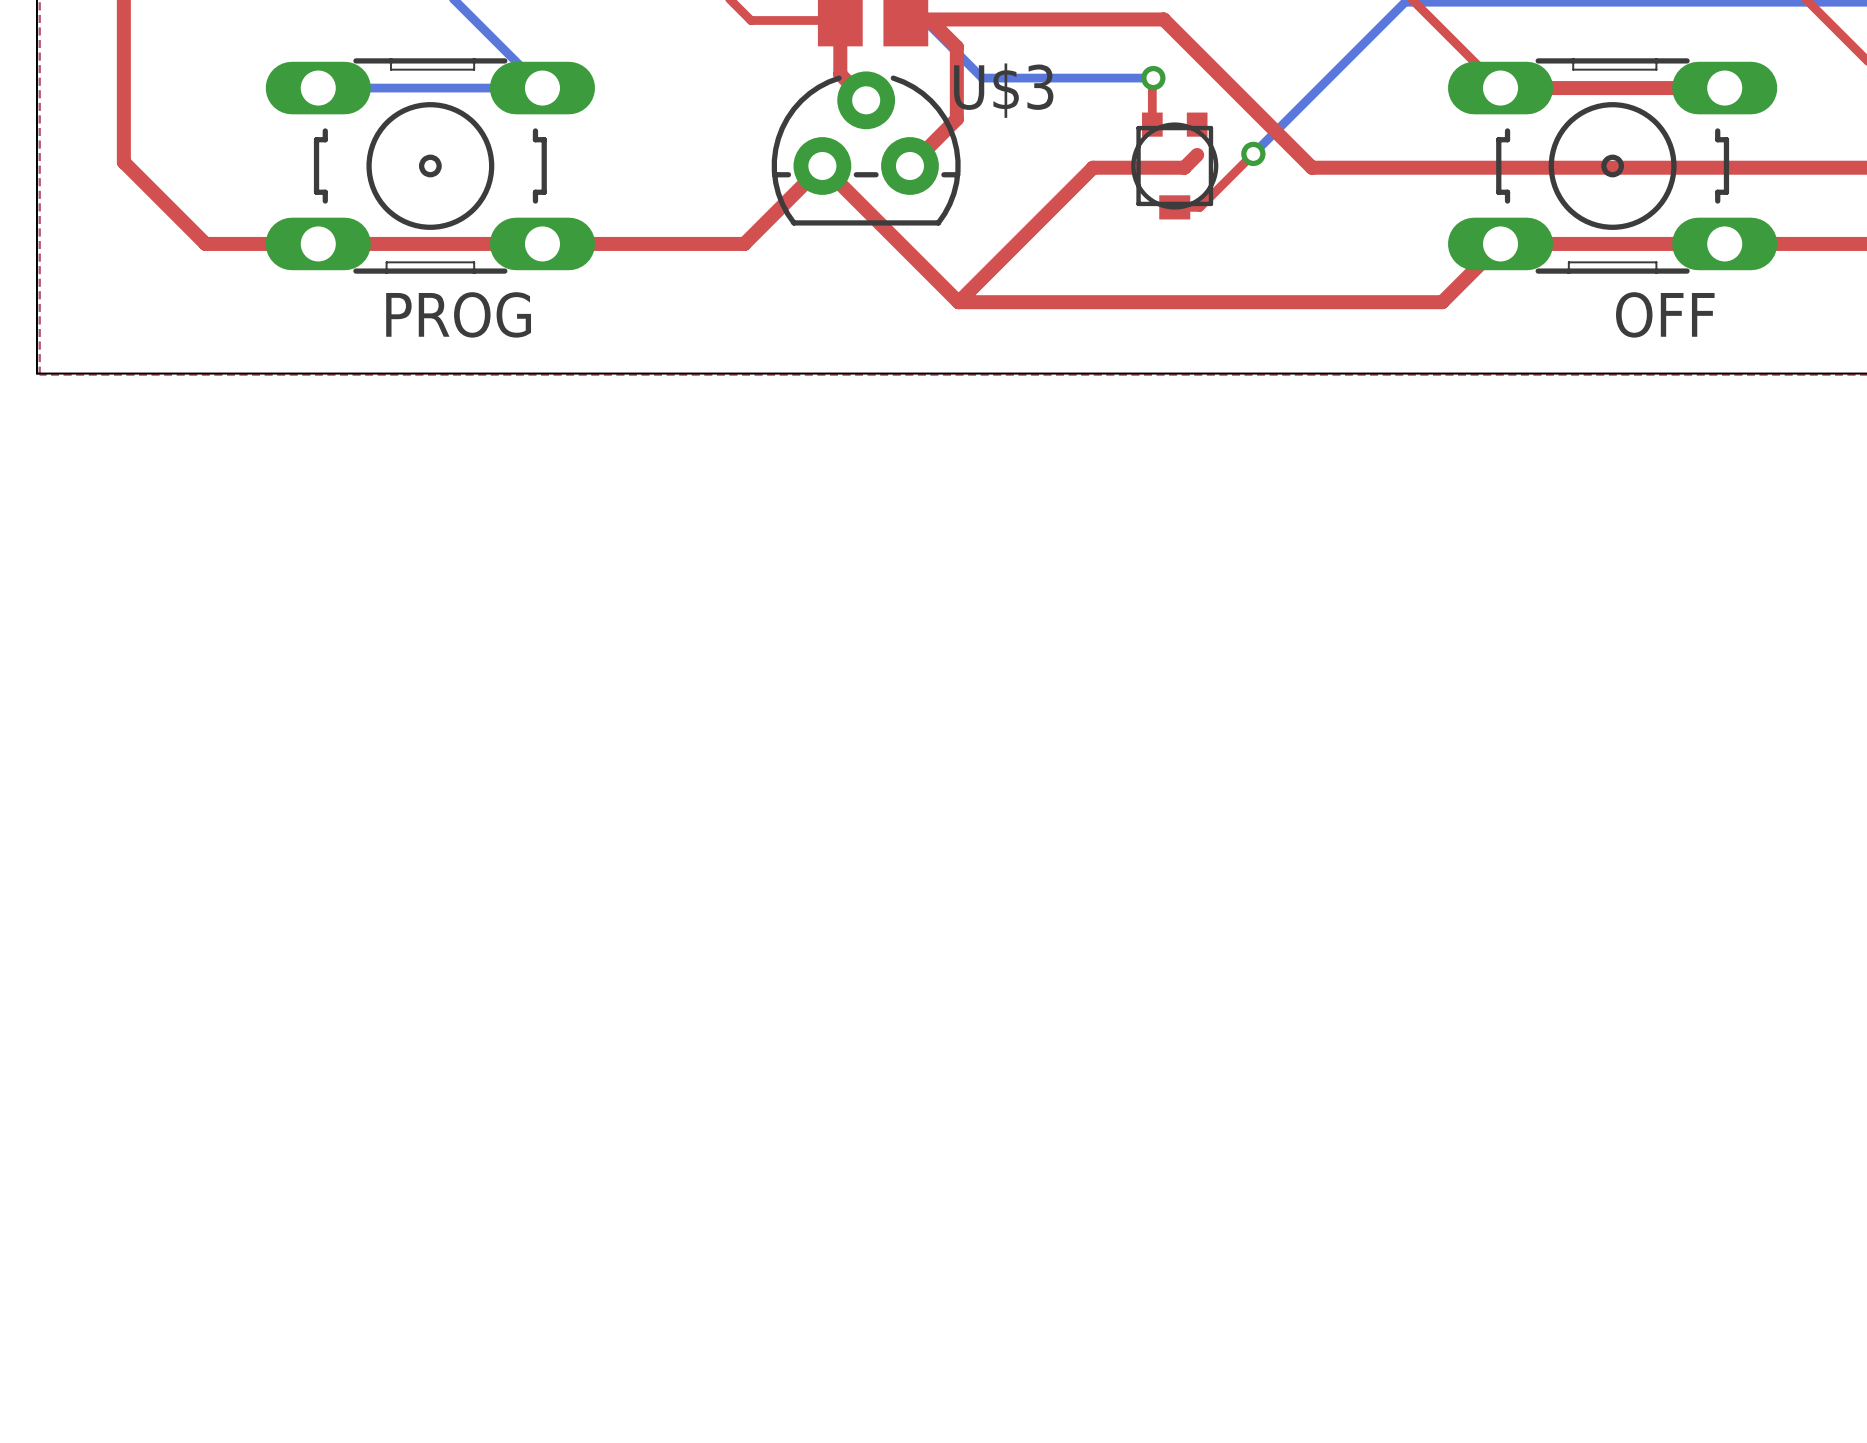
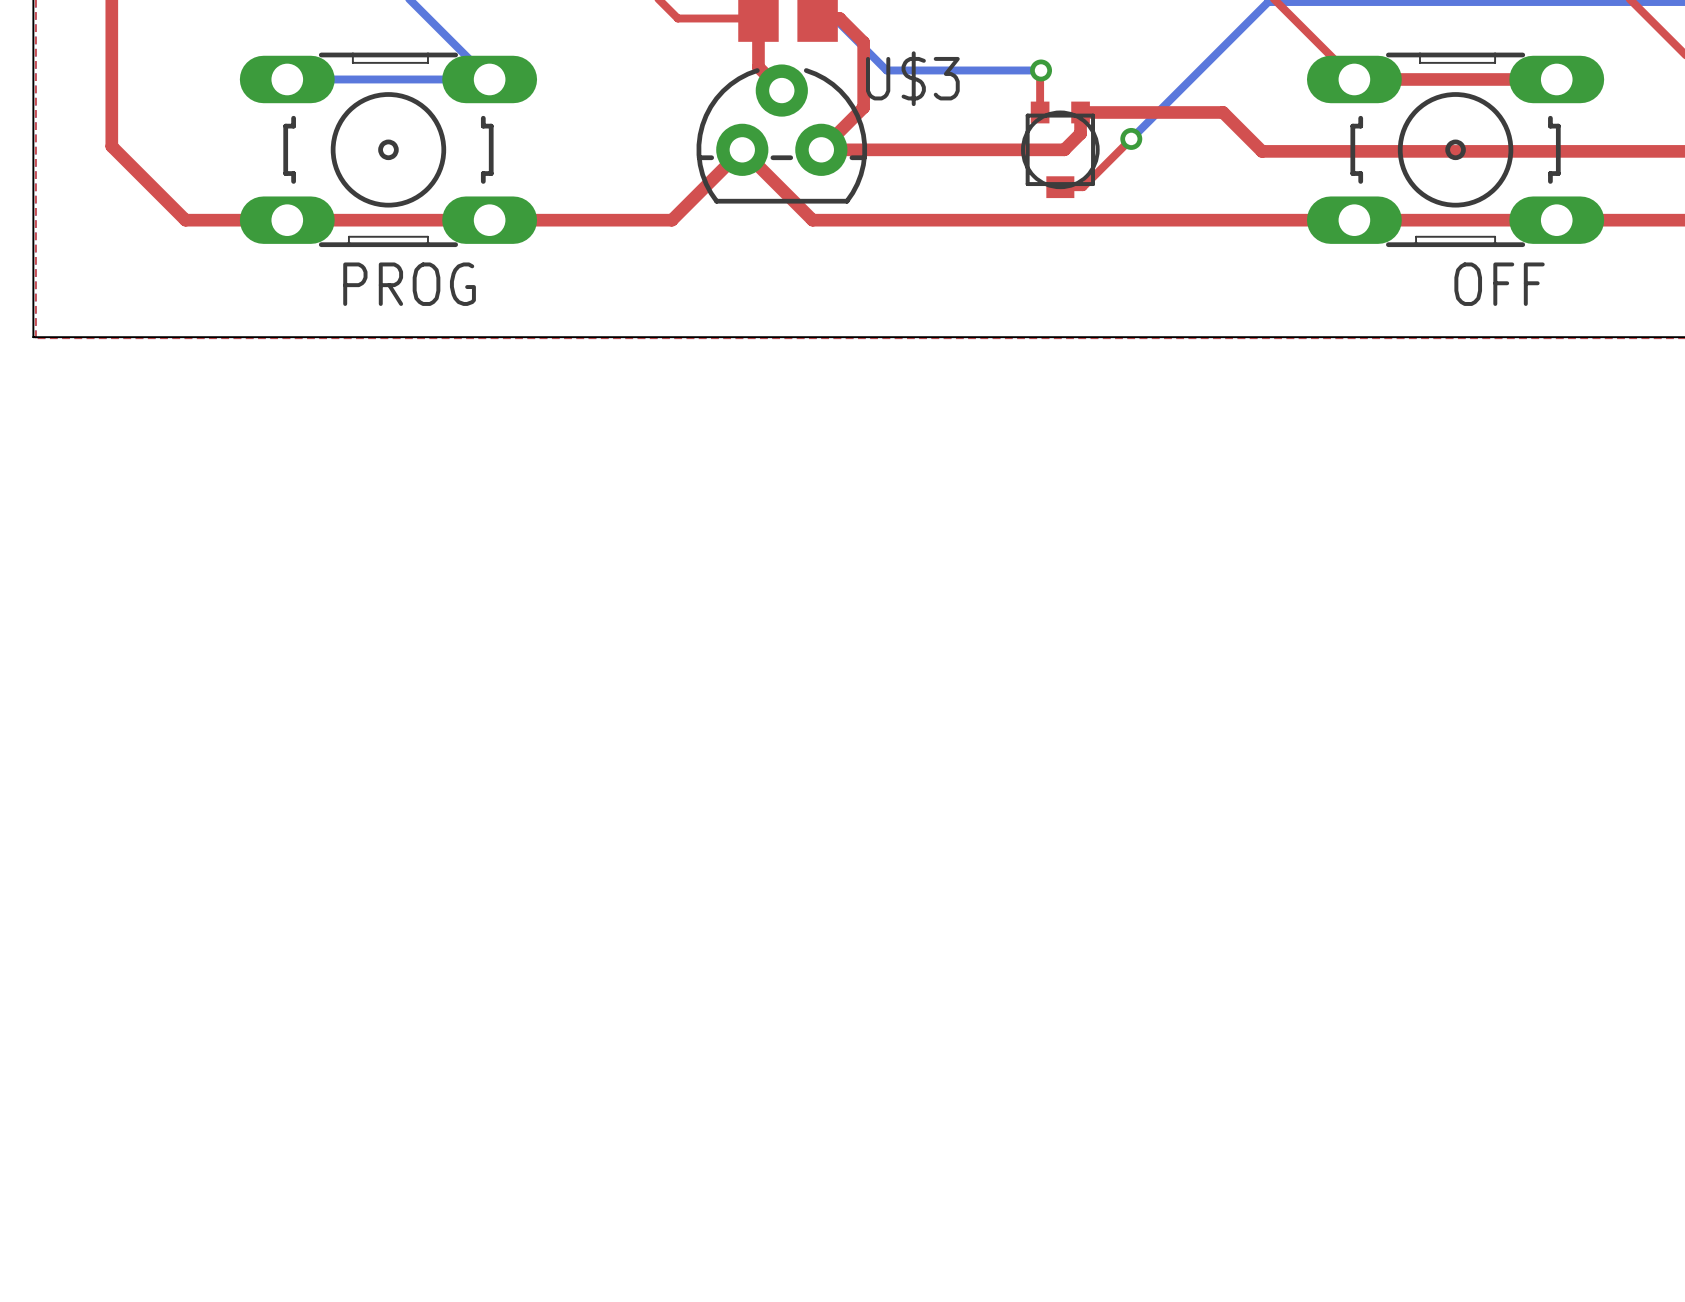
top track: (905, 20) (1163, 19) (1311, 167) (1398, 167) -> (821, 149) (1064, 149) (1080, 133) (1080, 112) (1223, 112) (1262, 151)
top track: (1197, 154) (1184, 167) (1093, 167) (958, 302) -> none
top track: (900, 243) (958, 302) -> none
top track: (1500, 243) (1442, 302) (958, 302) -> (1354, 220) (812, 220)

